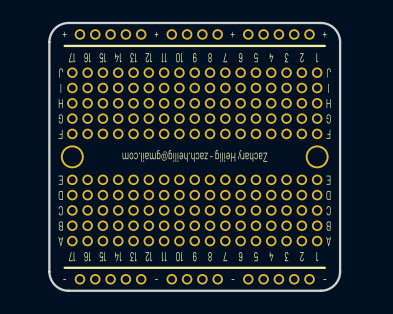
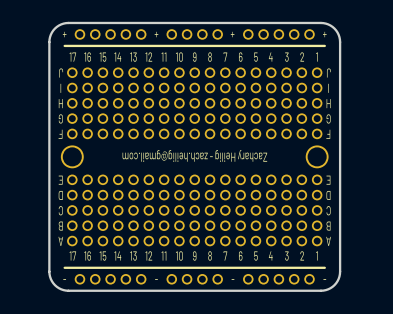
text rotation: 0° (72, 57) -> 180° (72, 57)
text rotation: 0° (87, 57) -> 180° (87, 57)
text rotation: 0° (102, 57) -> 180° (102, 57)
text rotation: 0° (118, 57) -> 180° (117, 57)
text rotation: 0° (133, 57) -> 180° (133, 57)
text rotation: 0° (148, 57) -> 180° (148, 57)
text rotation: 0° (164, 57) -> 180° (163, 57)
text rotation: 0° (179, 57) -> 180° (179, 57)
text rotation: 0° (194, 57) -> 180° (194, 57)
text rotation: 0° (210, 57) -> 180° (210, 57)
text rotation: 0° (225, 57) -> 180° (225, 57)
text rotation: 0° (240, 57) -> 180° (240, 57)
text rotation: 0° (255, 57) -> 180° (256, 57)
text rotation: 0° (271, 57) -> 180° (270, 57)
text rotation: 0° (286, 57) -> 180° (286, 57)
text rotation: 0° (301, 57) -> 180° (302, 57)
text rotation: 0° (317, 57) -> 180° (317, 57)
text rotation: 0° (72, 256) -> 180° (72, 255)
text rotation: 0° (87, 256) -> 180° (87, 255)
text rotation: 0° (102, 256) -> 180° (102, 256)
text rotation: 0° (118, 256) -> 180° (117, 255)
text rotation: 0° (133, 256) -> 180° (133, 256)
text rotation: 0° (148, 256) -> 180° (148, 255)
text rotation: 0° (164, 256) -> 180° (163, 255)
text rotation: 0° (179, 256) -> 180° (179, 255)
text rotation: 0° (194, 256) -> 180° (194, 255)
text rotation: 0° (210, 256) -> 180° (210, 255)
text rotation: 0° (225, 256) -> 180° (225, 255)
text rotation: 0° (240, 256) -> 180° (240, 255)
text rotation: 0° (255, 256) -> 180° (256, 256)
text rotation: 0° (271, 256) -> 180° (270, 255)
text rotation: 0° (286, 256) -> 180° (286, 256)
text rotation: 0° (301, 256) -> 180° (302, 255)
text rotation: 0° (317, 256) -> 180° (317, 255)

